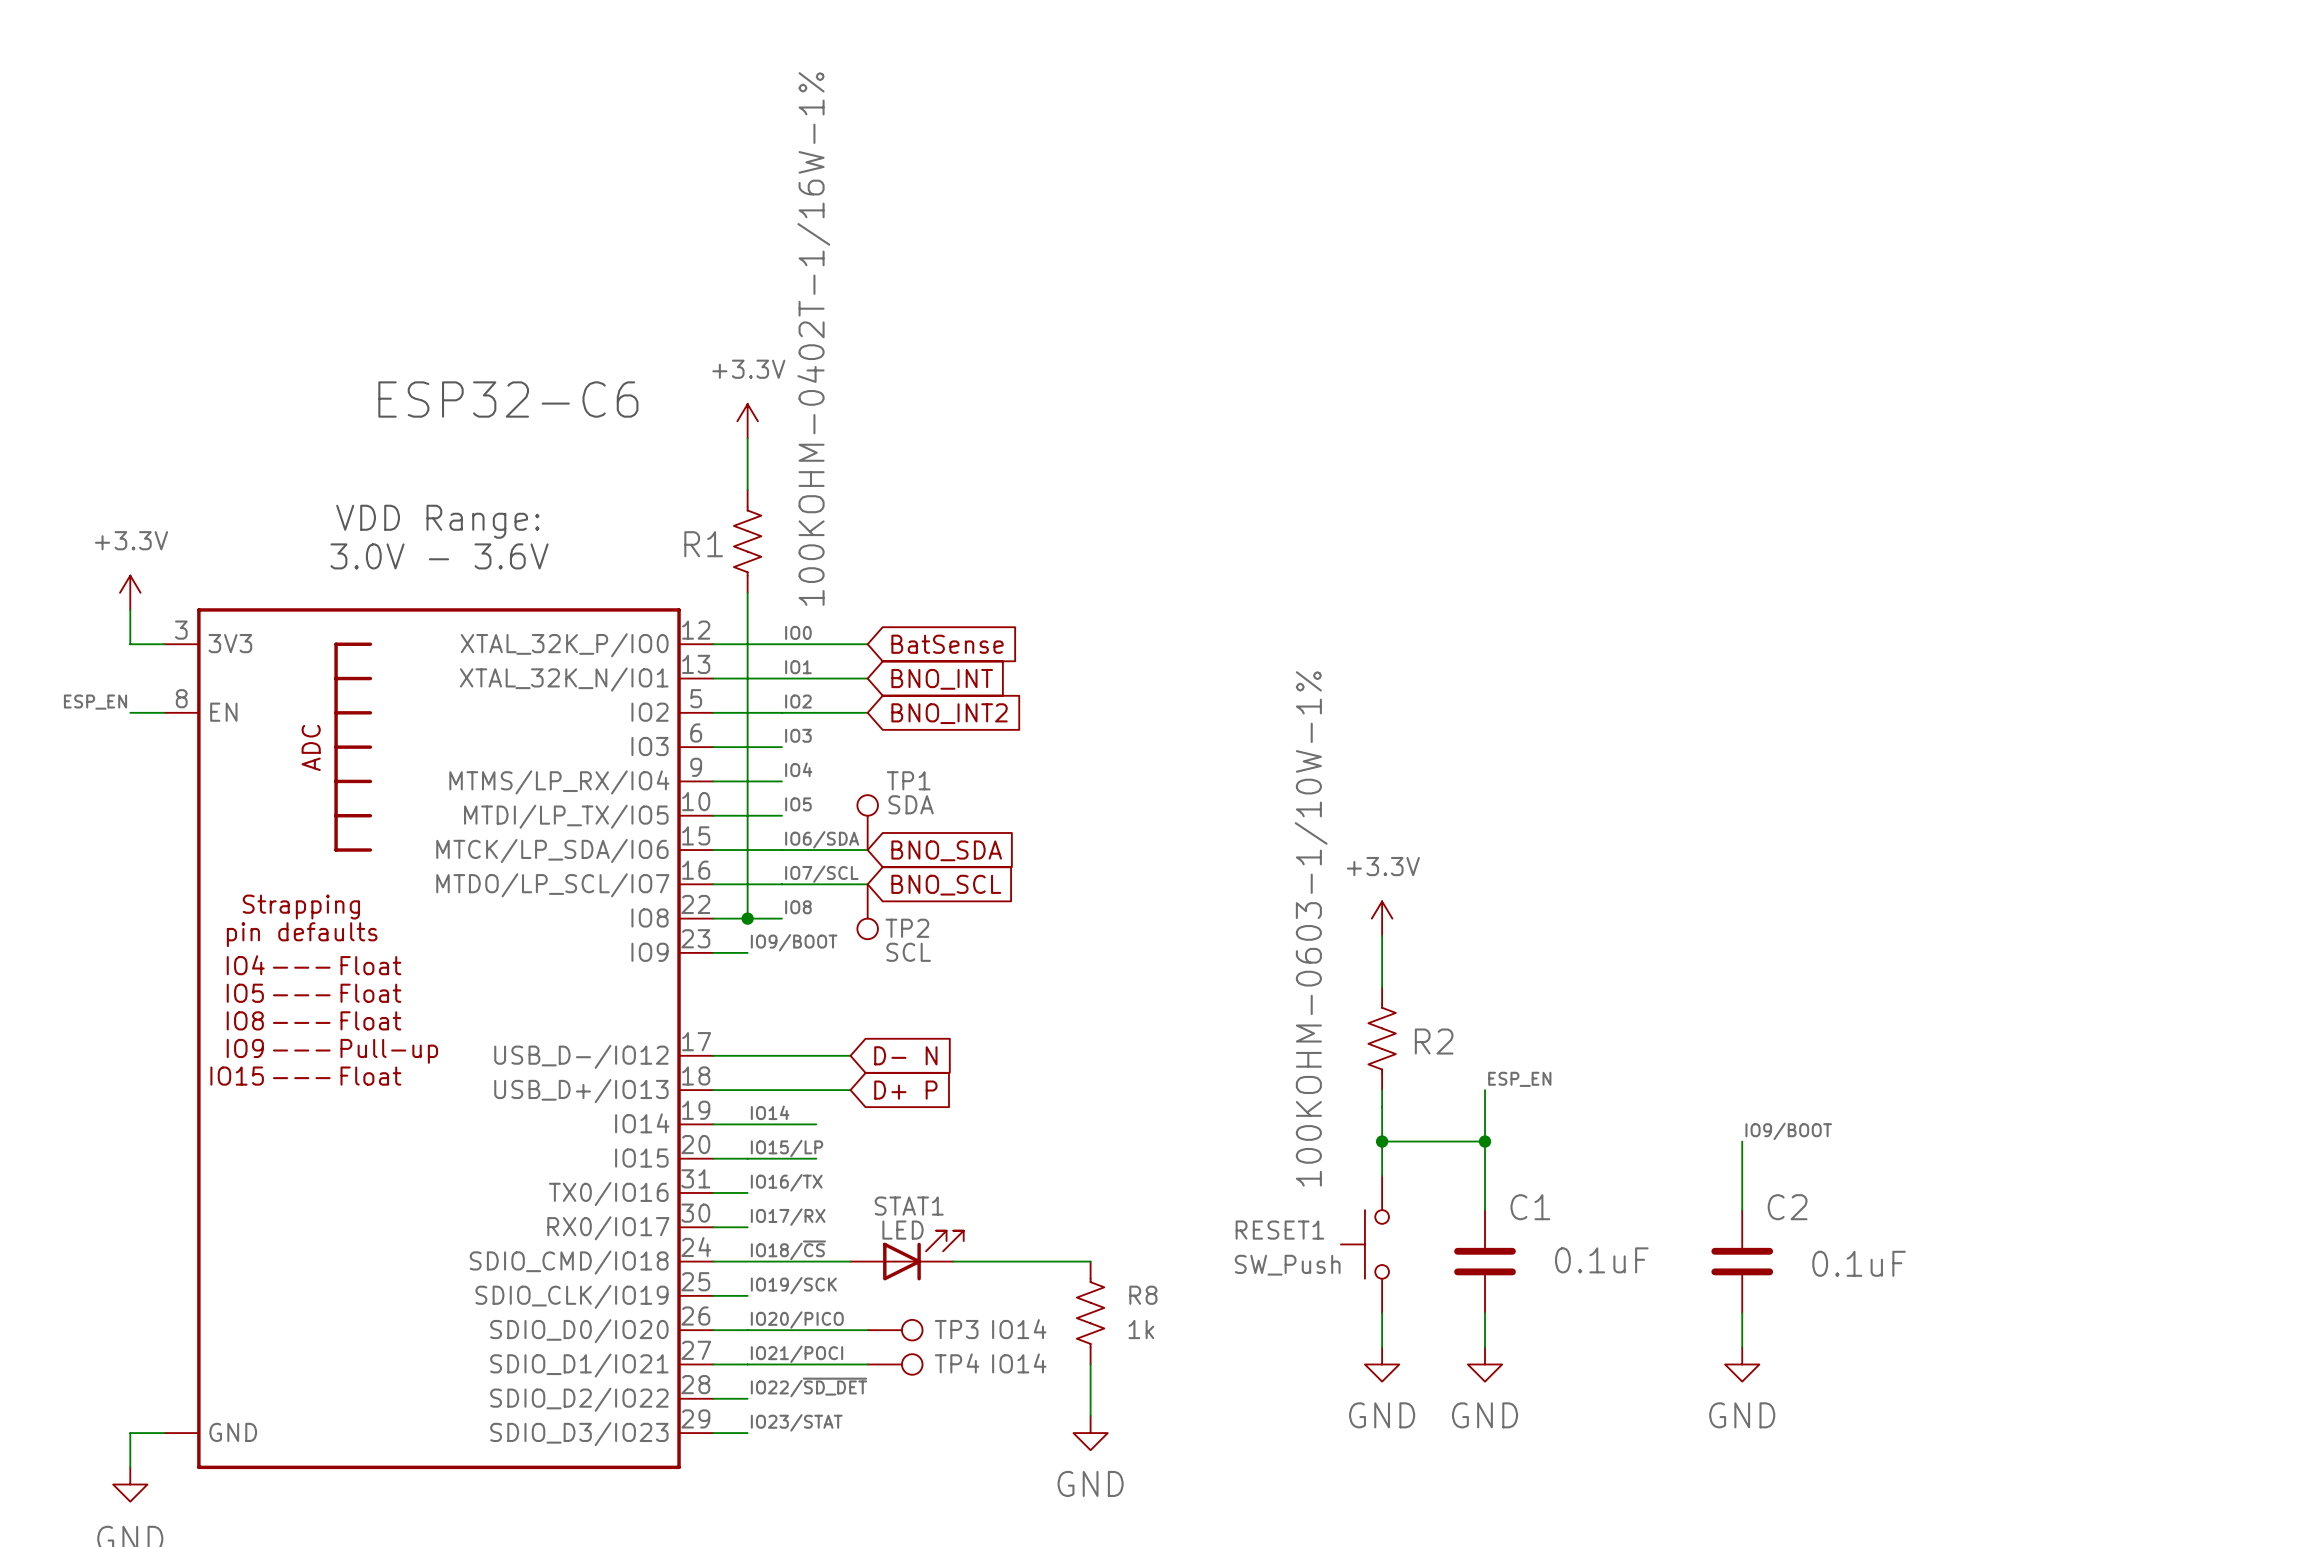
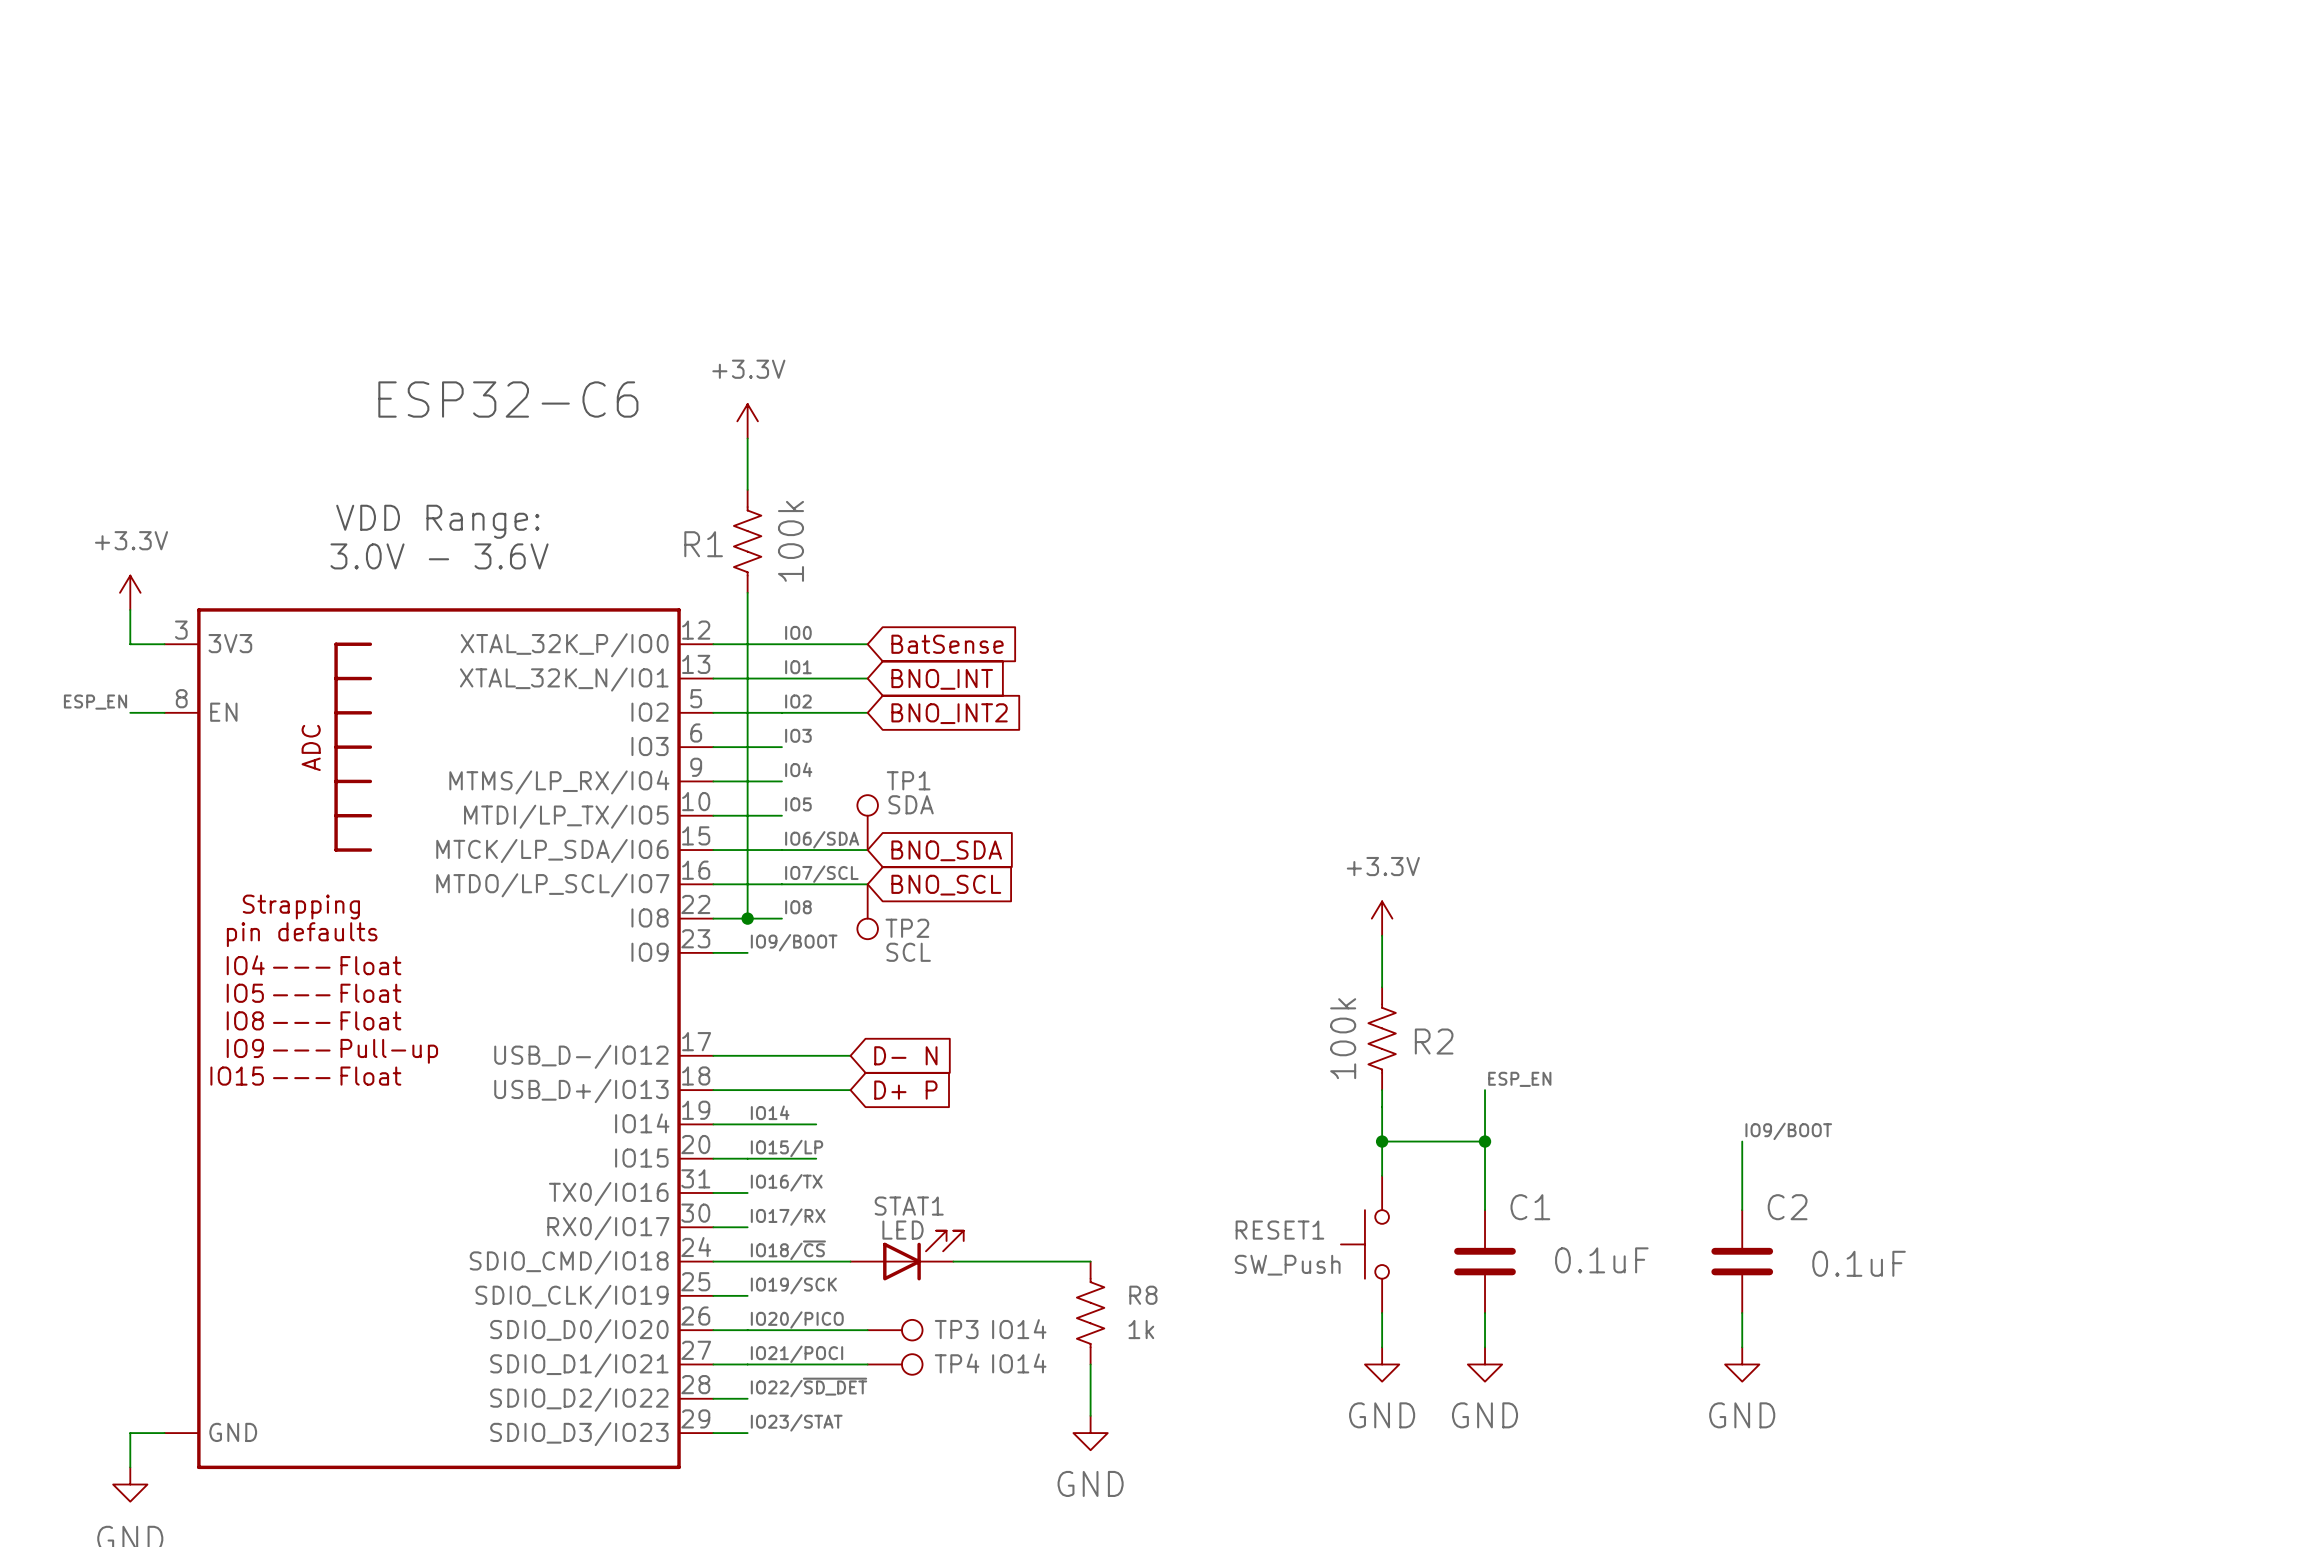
R1 value: 100KOHM-0402T-1/16W-1% (813, 339) -> 100k (790, 541)
R2 value: 100KOHM-0603-1/10W-1% (1311, 928) -> 100k (1343, 1038)

